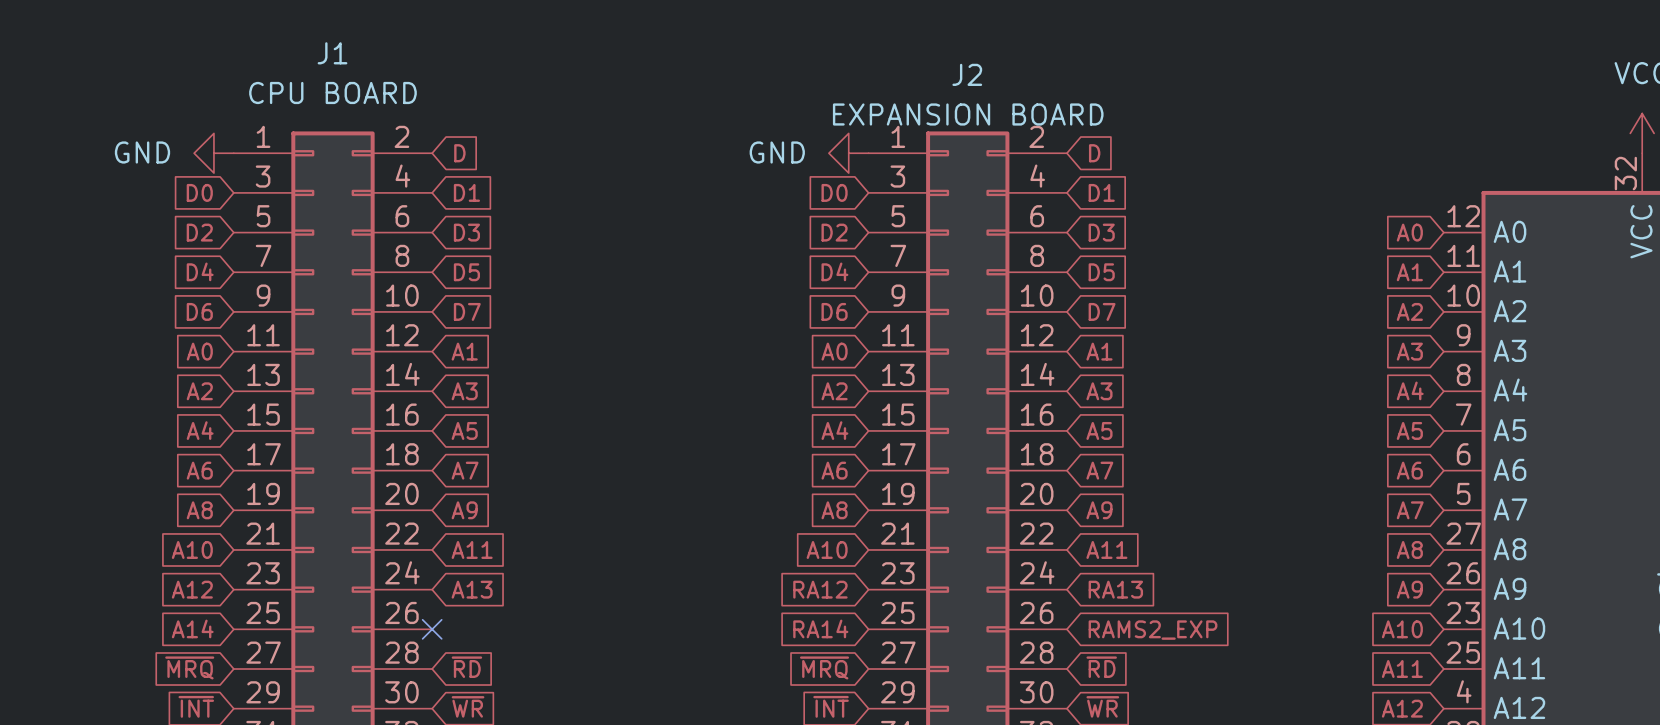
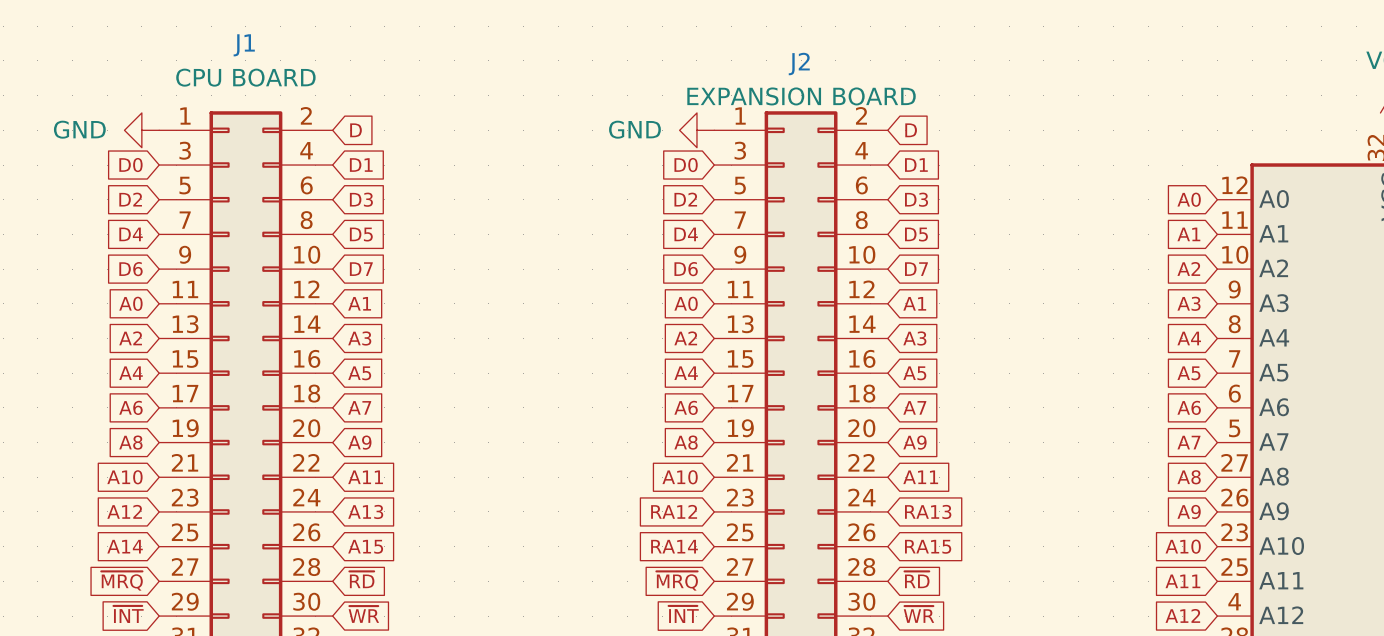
no-connect mark: (432, 629) -> none
global label: none -> A15 (365, 546)
global label: RAMS2_EXP (1153, 630) -> RA15 (928, 546)

